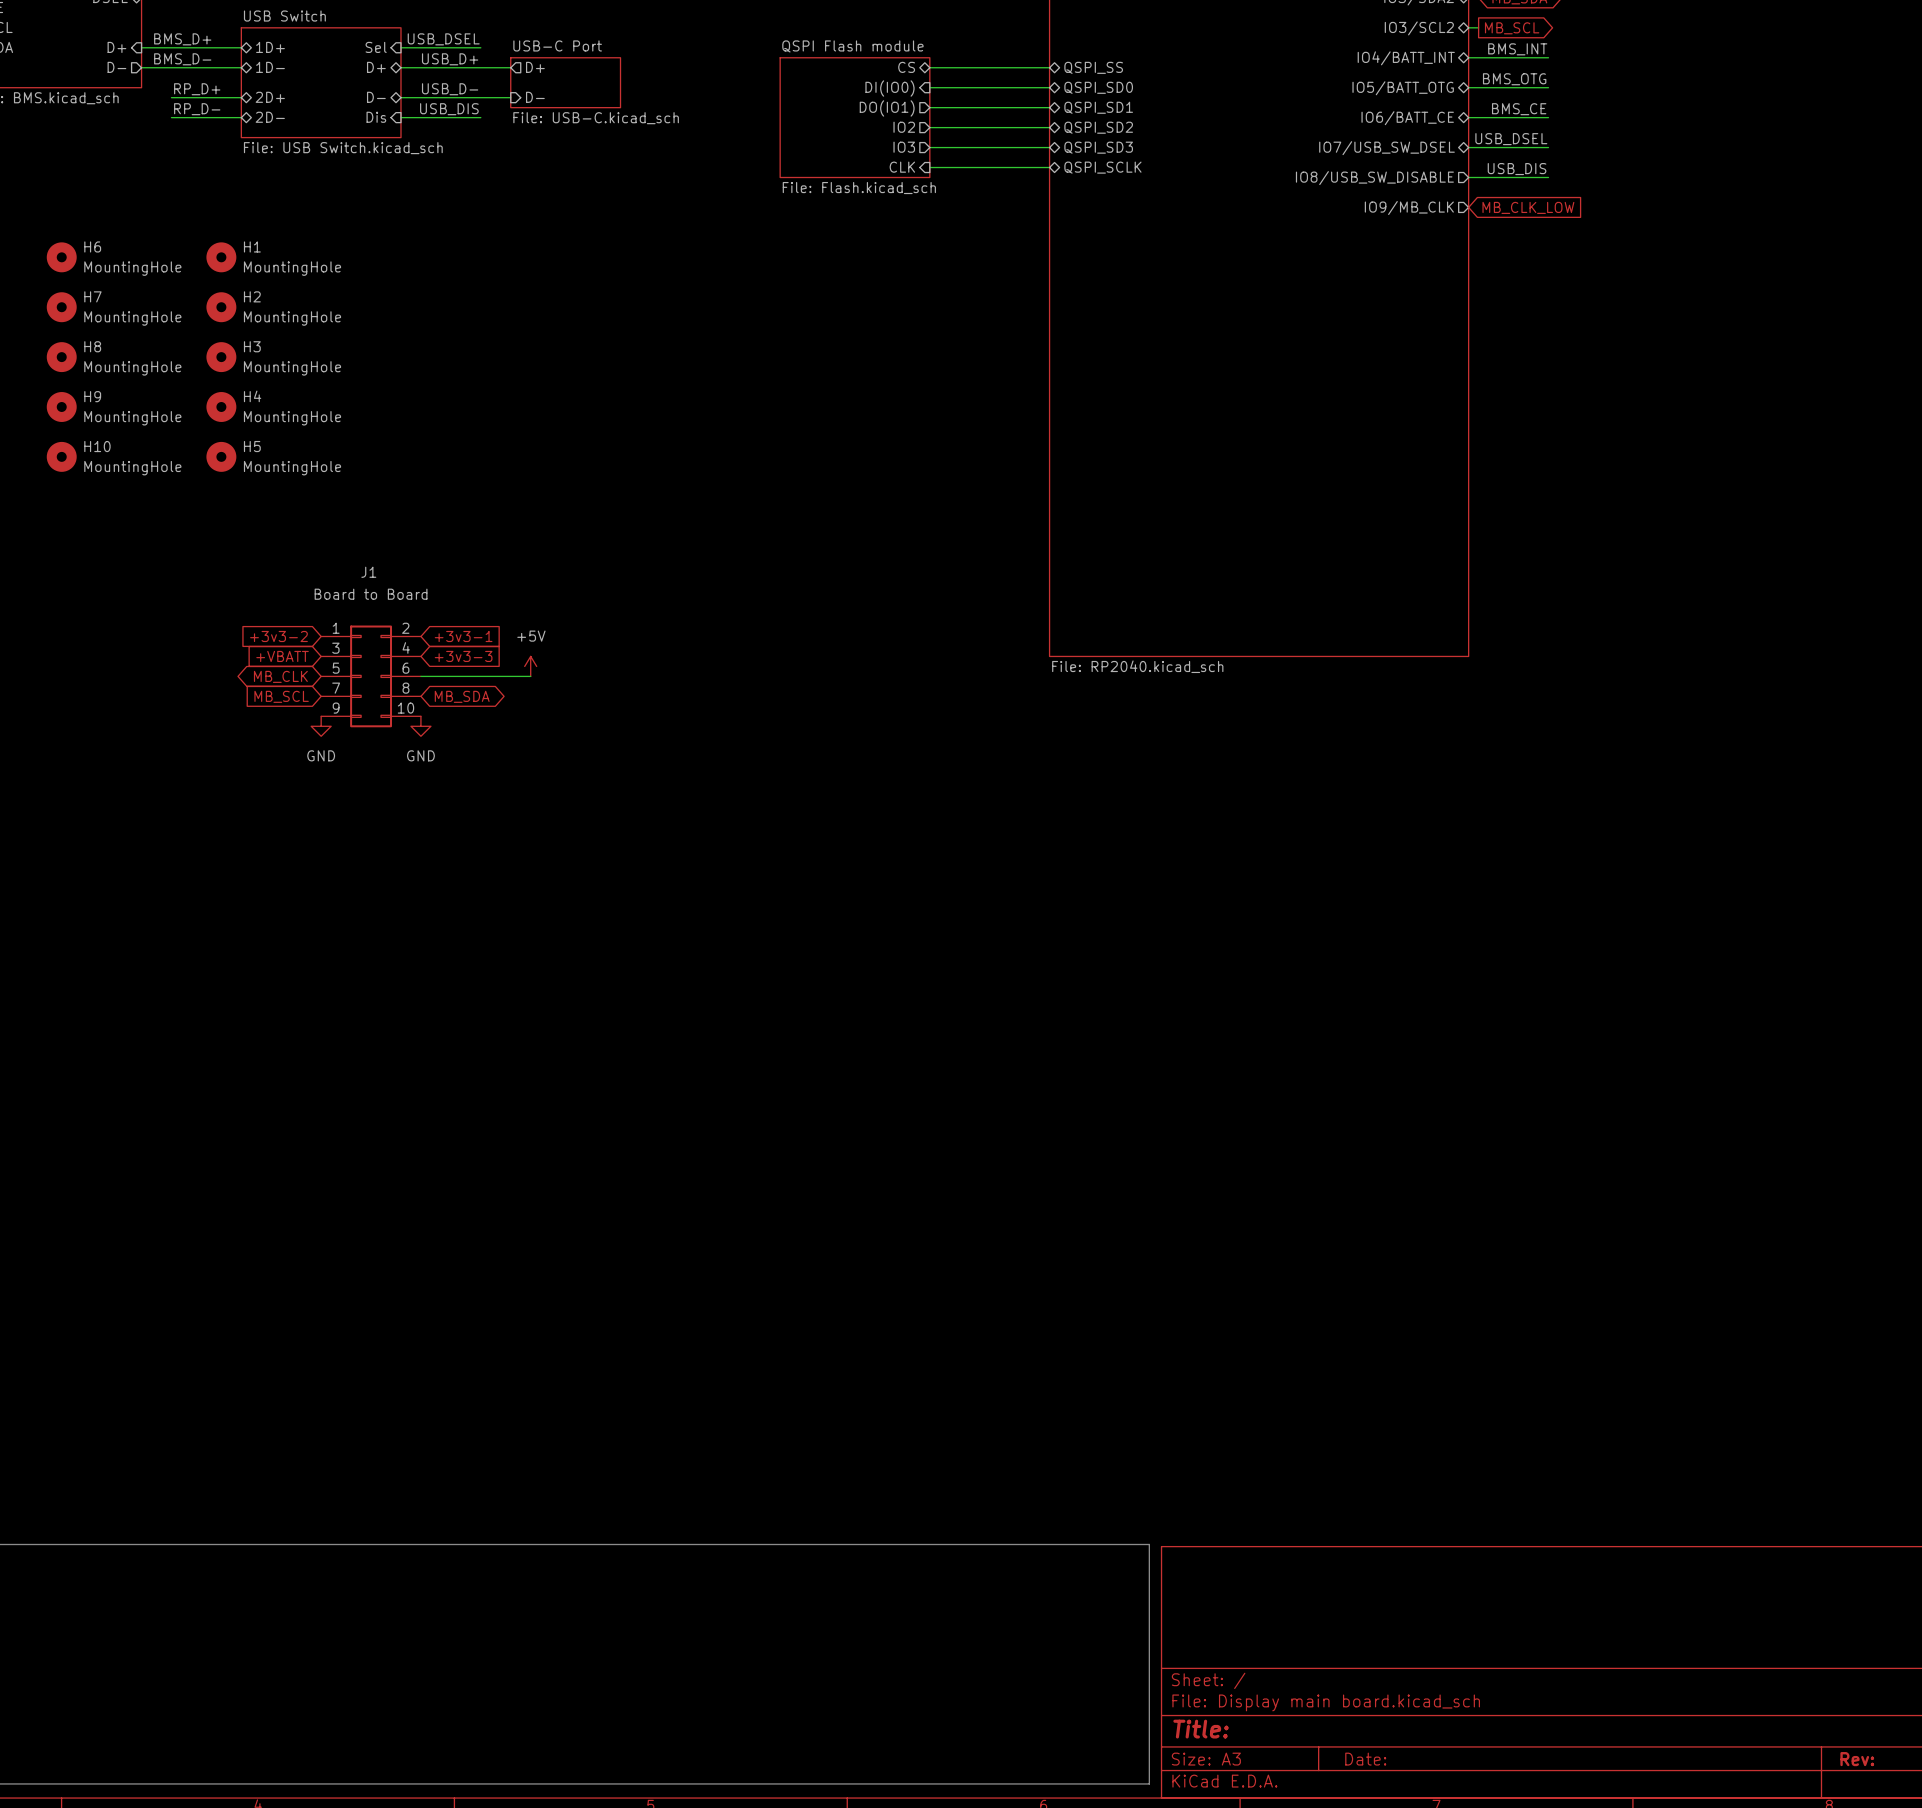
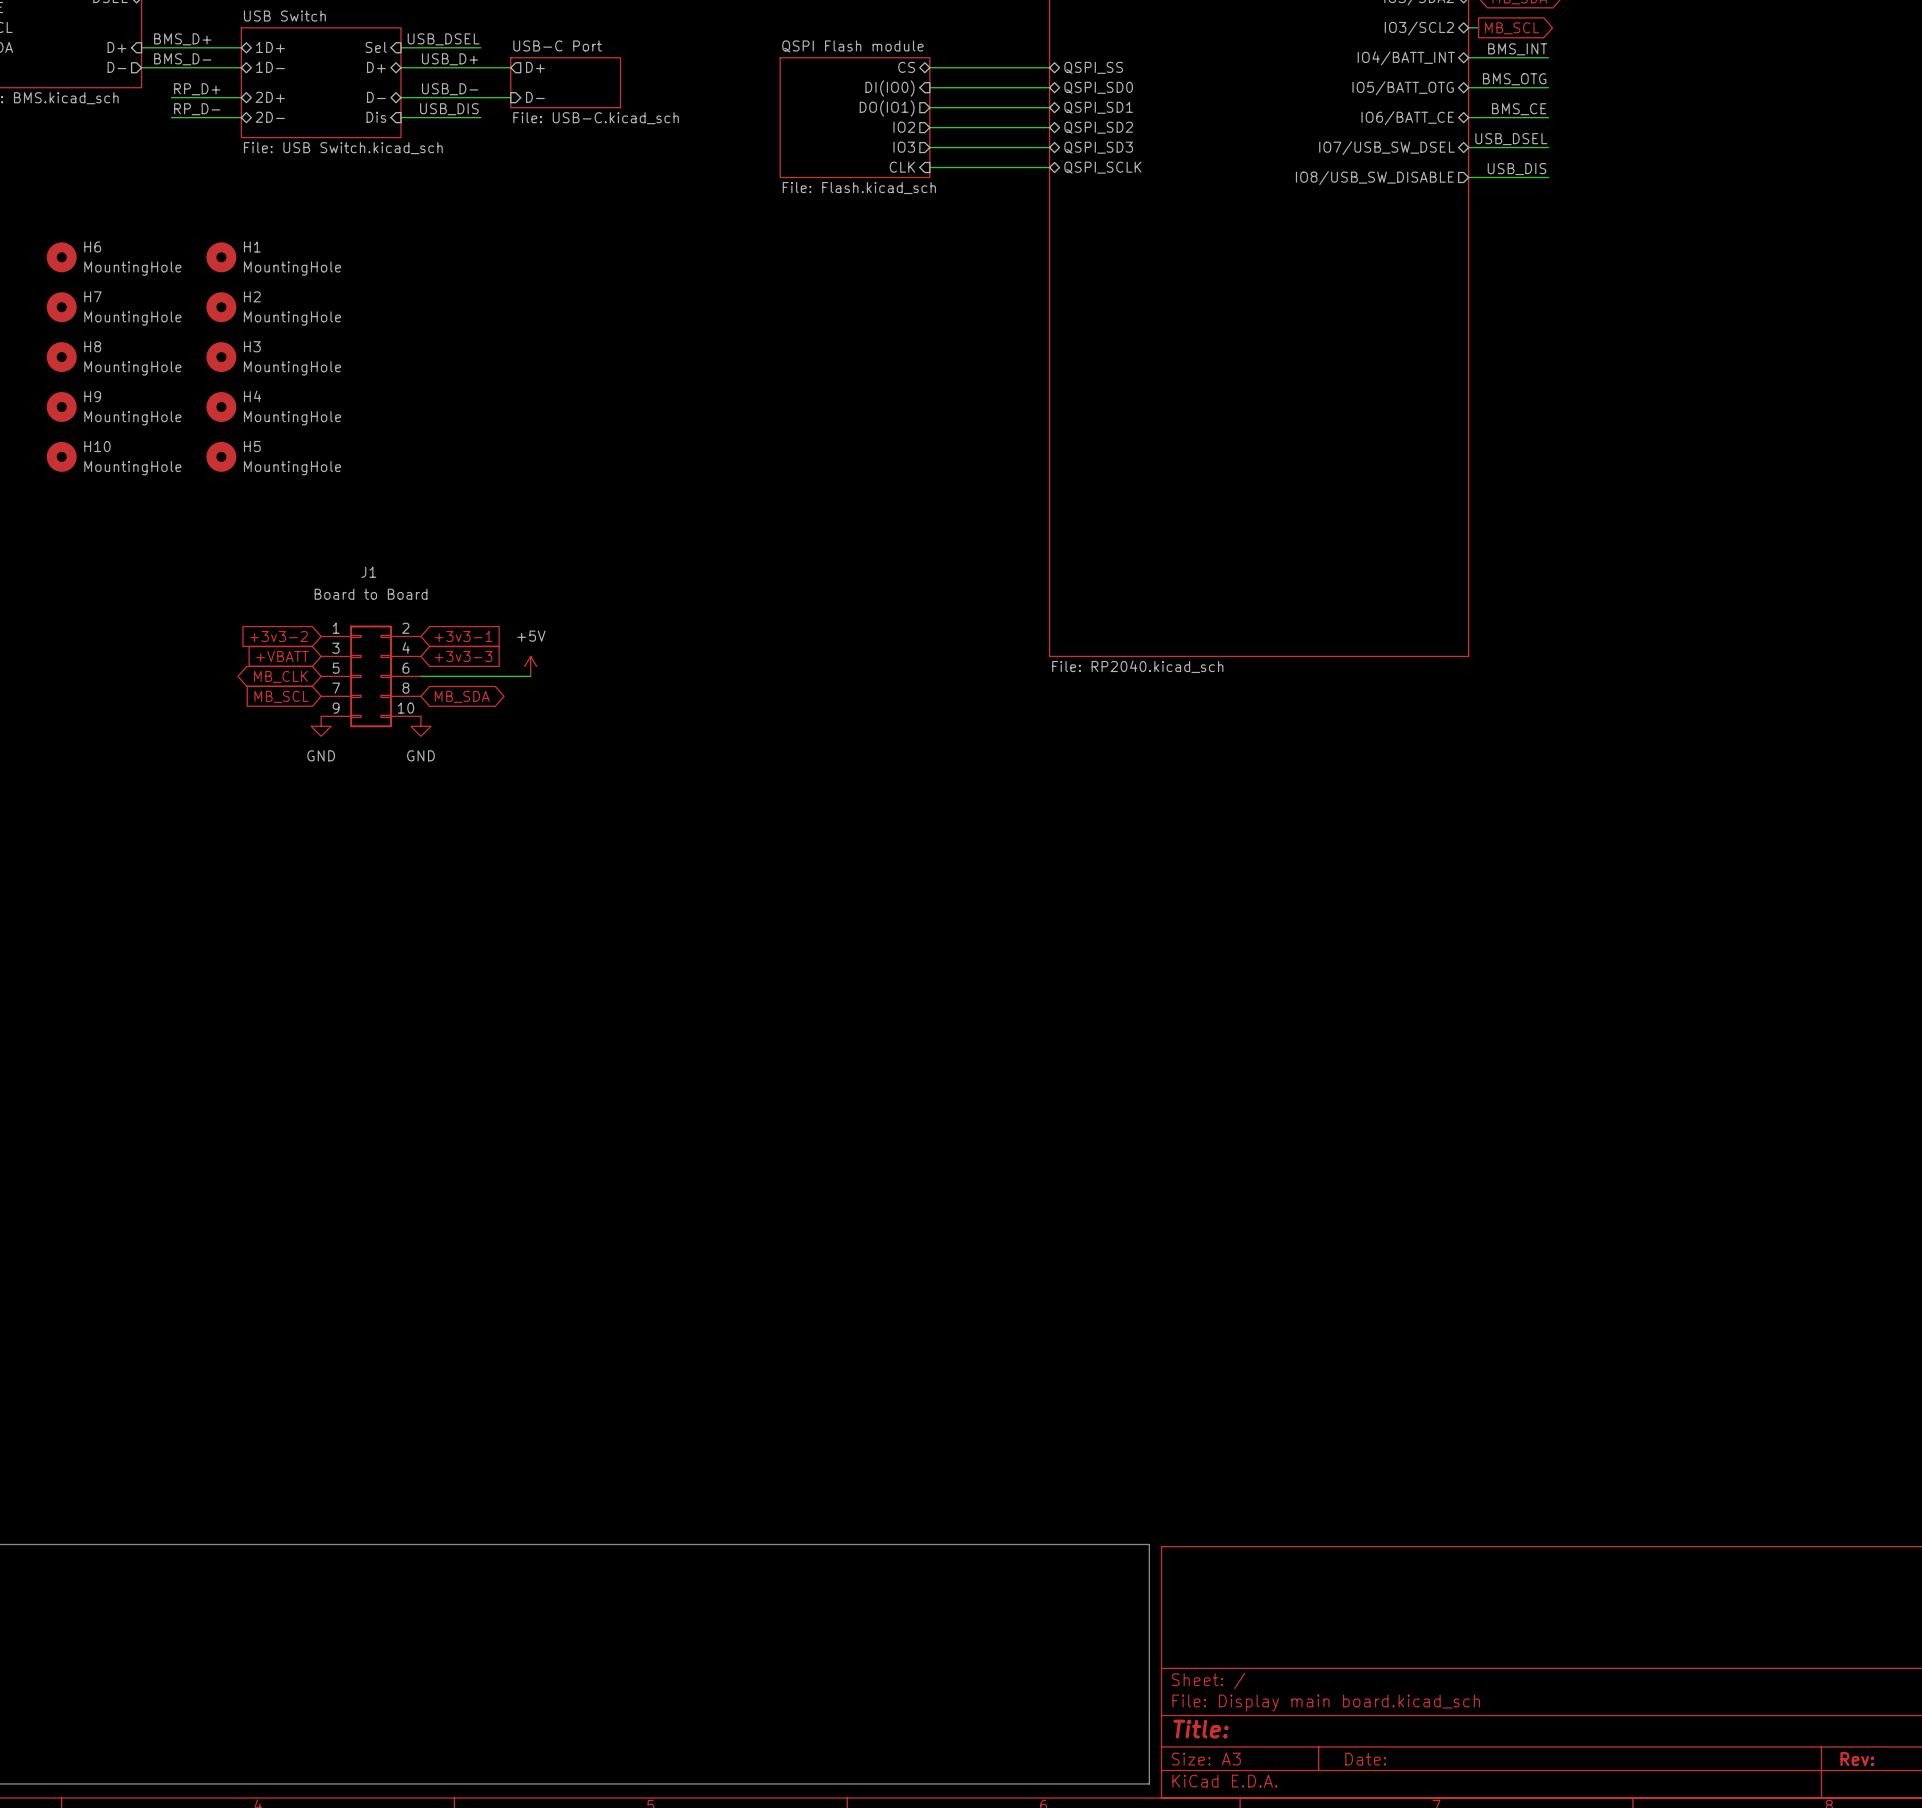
global label: MB_CLK_LOW (1528, 207) -> none
sheet pin: IO9/MB_CLK (1409, 208) -> none

